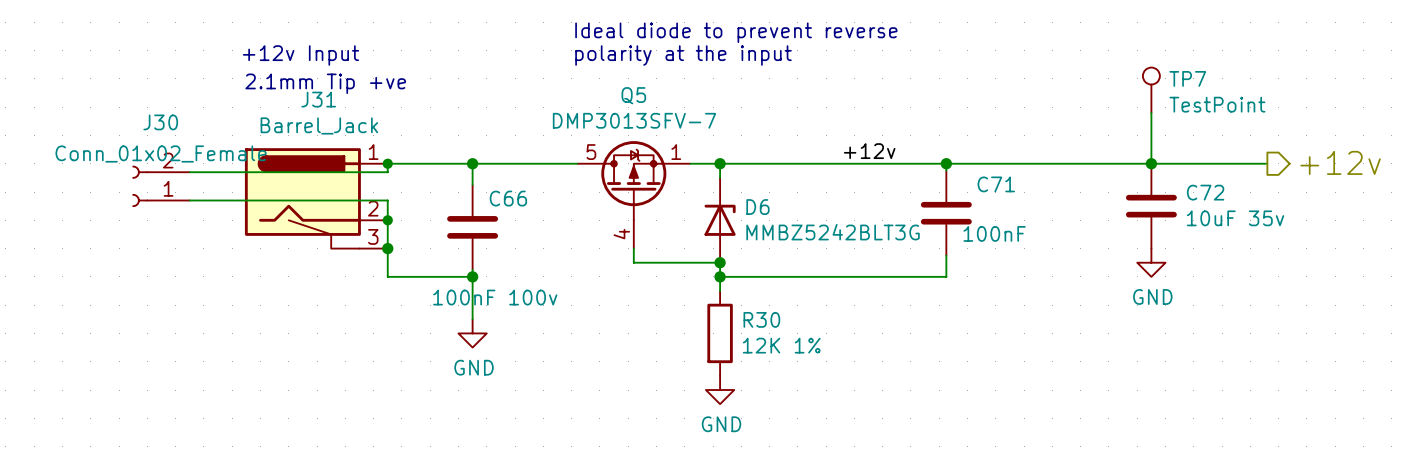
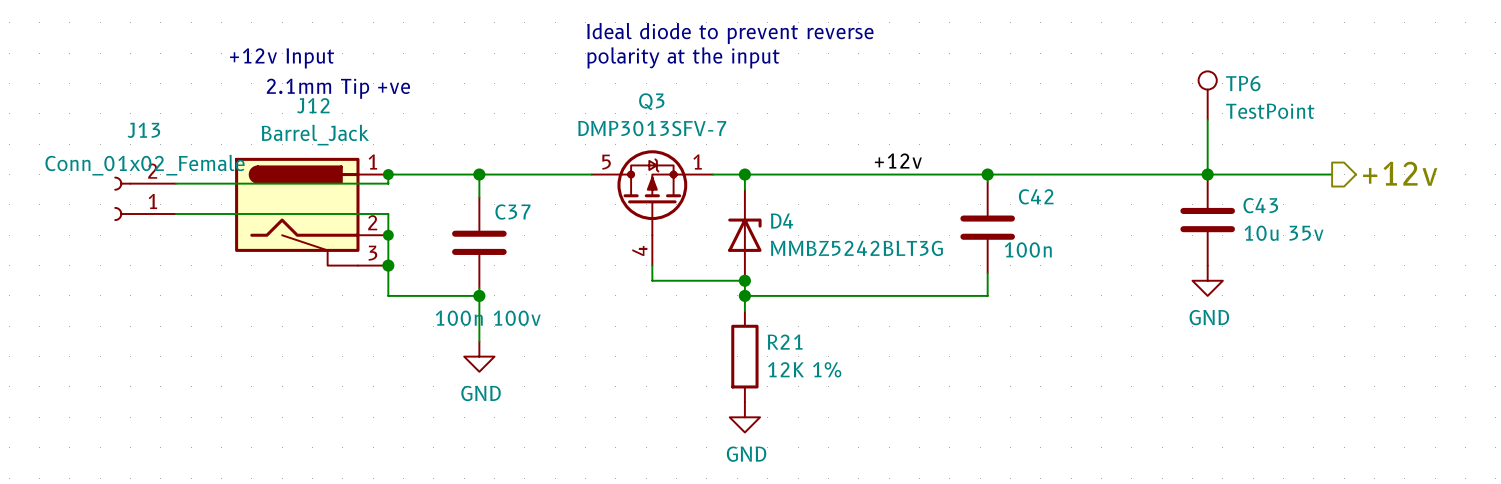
TP7 name: TP7 (1187, 78) -> TP6 (1243, 83)
Q5 name: Q5 (633, 95) -> Q3 (651, 101)
J31 name: J31 (318, 99) -> J12 (313, 105)
J30 name: J30 (160, 122) -> J13 (143, 130)
C71 name: C71 (996, 184) -> C42 (1036, 196)
C72 name: C72 (1205, 192) -> C43 (1260, 205)
C66 name: C66 (508, 198) -> C37 (512, 212)
D6 name: D6 (757, 207) -> D4 (782, 221)
C72 value: 10uF 35v (1235, 218) -> 10u 35v (1284, 233)
C71 value: 100nF (994, 233) -> 100n (1028, 249)
C66 value: 100nF 100v (495, 297) -> 100n 100v (488, 318)
R30 name: R30 (761, 319) -> R21 (785, 342)

